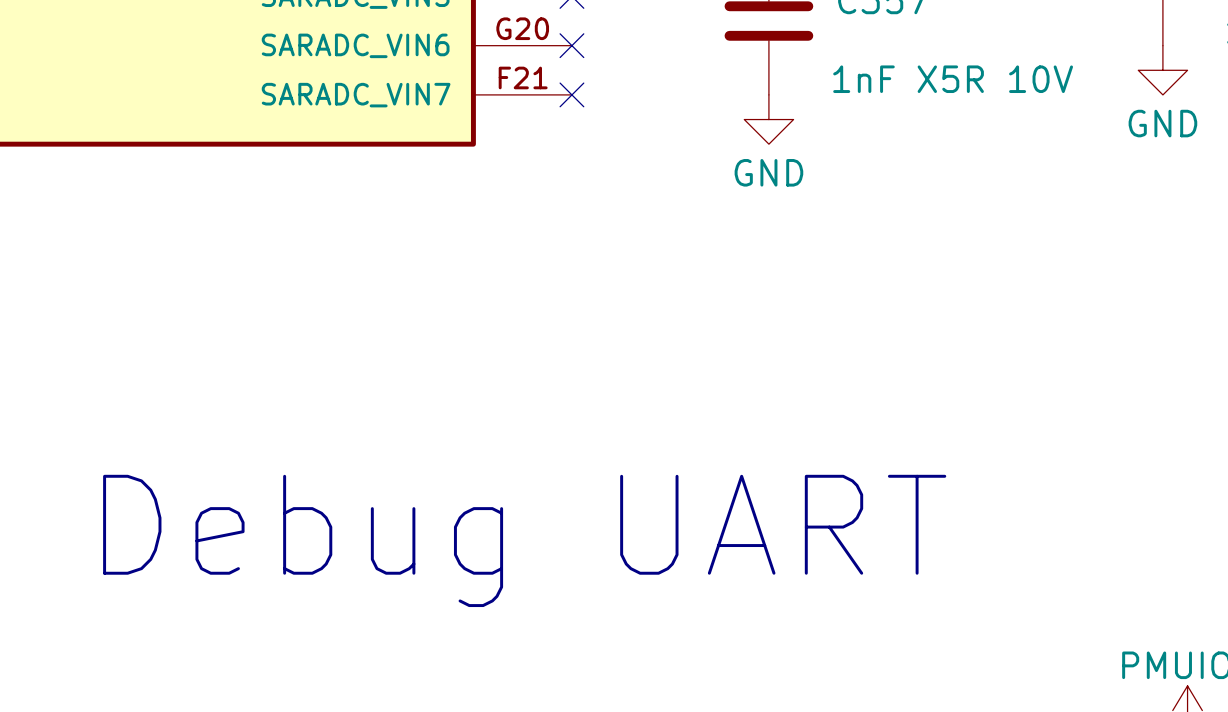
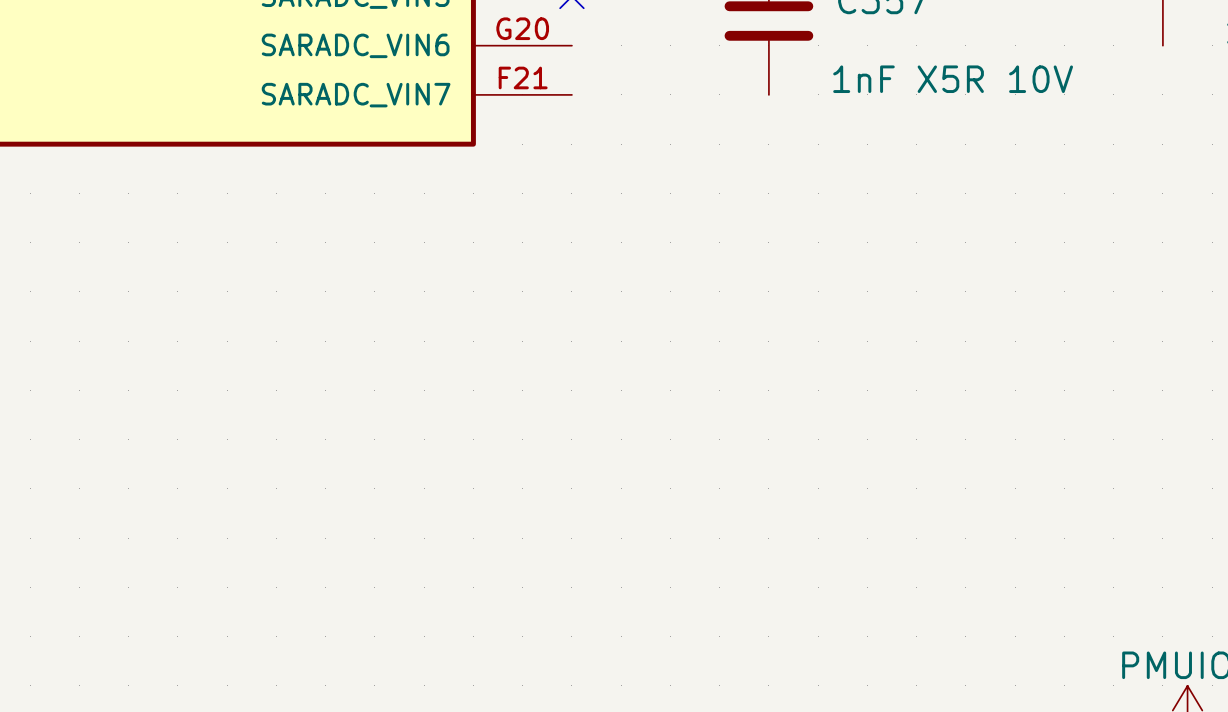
no-connect mark: (571, 45) -> none
power symbol: GND (1162, 70) -> none
no-connect mark: (571, 94) -> none
power symbol: GND (768, 119) -> none
text: Debug UART (524, 540) -> none

